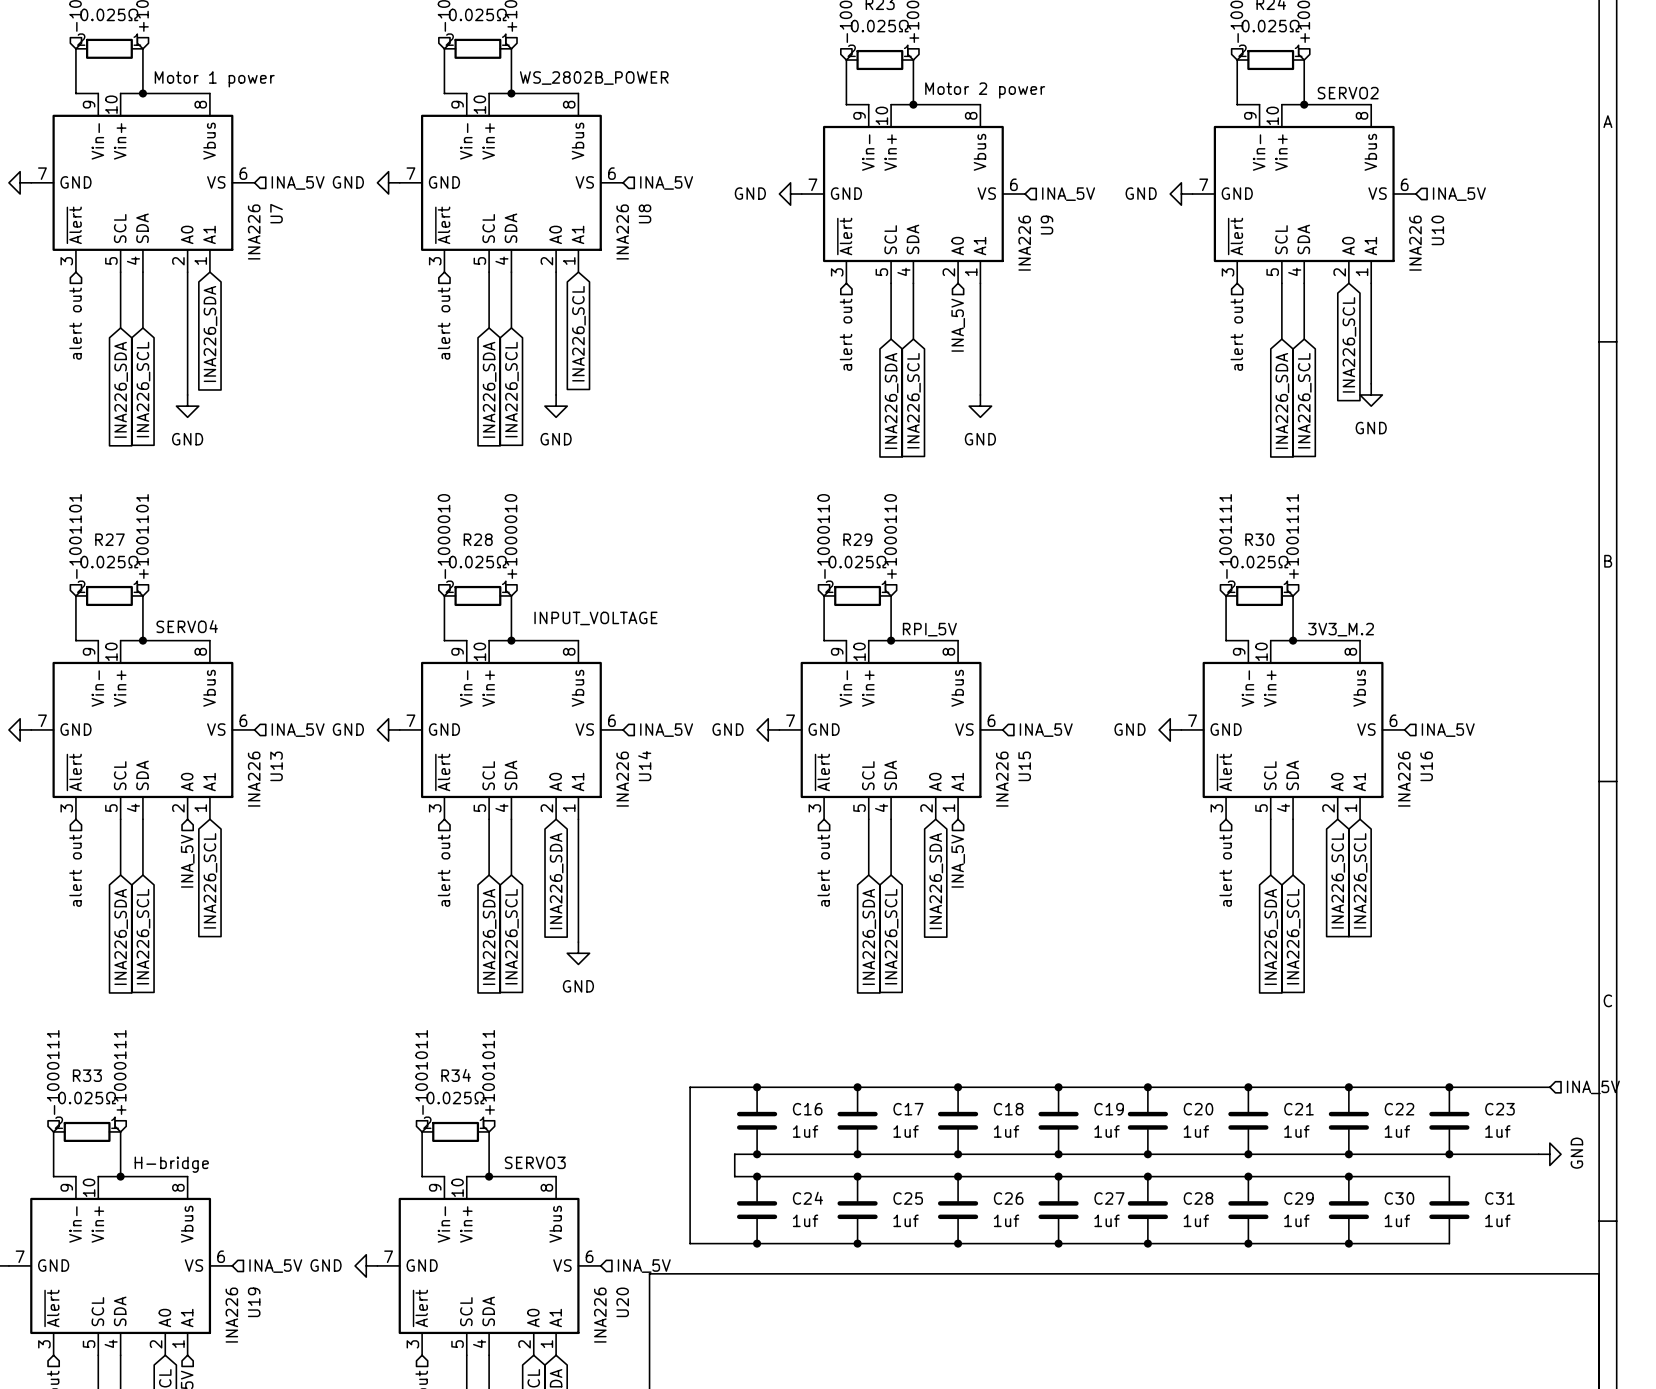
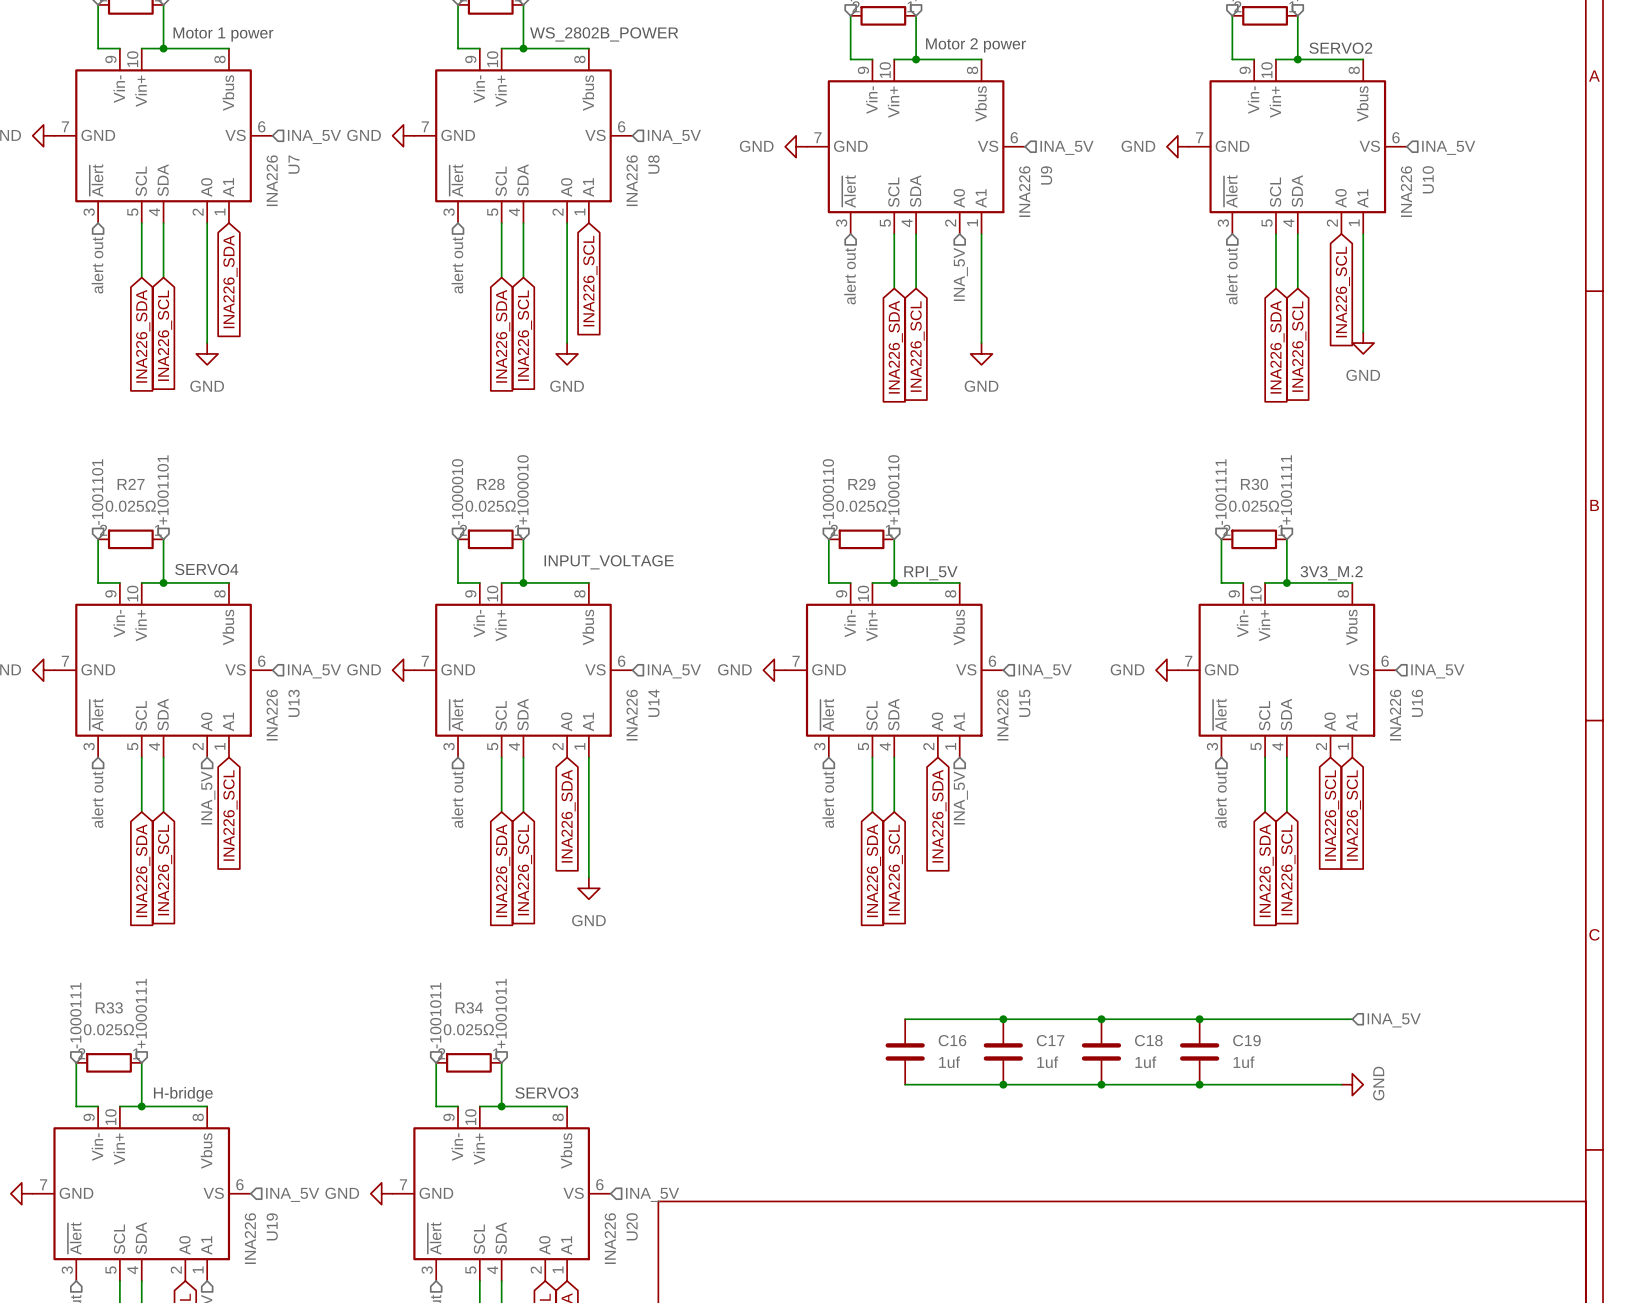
junction: (757, 1087) -> none
junction: (857, 1087) -> none
wire: (902, 1087) (690, 1087) (690, 1243) (1449, 1243) -> none
junction: (958, 1087) -> none
junction: none -> (1003, 1019)
junction: (1058, 1087) -> none
junction: none -> (1101, 1019)
junction: (1147, 1087) -> none
junction: none -> (1199, 1019)
junction: (1248, 1087) -> none
junction: (1348, 1087) -> none
wire: (1360, 1087) (1549, 1087) -> none
junction: (1449, 1087) -> none
hierarchical label position: INA_5V (1593, 1087) -> INA_5V (1394, 1020)
C16 position: (757, 1120) -> (905, 1051)
C17 position: (857, 1120) -> (1003, 1051)
C18 position: (958, 1120) -> (1101, 1051)
C19 position: (1058, 1120) -> (1199, 1051)
C20: 1uf (1147, 1120) -> none
C21: 1uf (1248, 1120) -> none
C22: 1uf (1348, 1120) -> none
C23: 1uf (1449, 1120) -> none
junction: (757, 1154) -> none
junction: (857, 1154) -> none
wire: (902, 1154) (734, 1154) (734, 1176) (1449, 1176) -> none
junction: (958, 1154) -> none
junction: none -> (1003, 1084)
junction: (1058, 1154) -> none
junction: none -> (1101, 1084)
junction: (1147, 1154) -> none
junction: none -> (1199, 1084)
junction: (1248, 1154) -> none
wire: (1348, 1154) (1538, 1154) -> none
junction: (1348, 1154) -> none
junction: (1449, 1154) -> none
power symbol position: GND (1549, 1154) -> GND (1352, 1084)
junction: (757, 1176) -> none
junction: (857, 1176) -> none
junction: (958, 1176) -> none
junction: (1058, 1176) -> none
junction: (1147, 1176) -> none
junction: (1248, 1176) -> none
junction: (1348, 1176) -> none
C24: 1uf (757, 1210) -> none
C25: 1uf (857, 1210) -> none
C26: 1uf (958, 1210) -> none
C27: 1uf (1058, 1210) -> none
C28: 1uf (1147, 1210) -> none
C29: 1uf (1248, 1210) -> none
C30: 1uf (1348, 1210) -> none
C31: 1uf (1449, 1210) -> none
junction: (757, 1243) -> none
junction: (857, 1243) -> none
junction: (958, 1243) -> none
junction: (1058, 1243) -> none
junction: (1147, 1243) -> none
junction: (1248, 1243) -> none
junction: (1348, 1243) -> none

